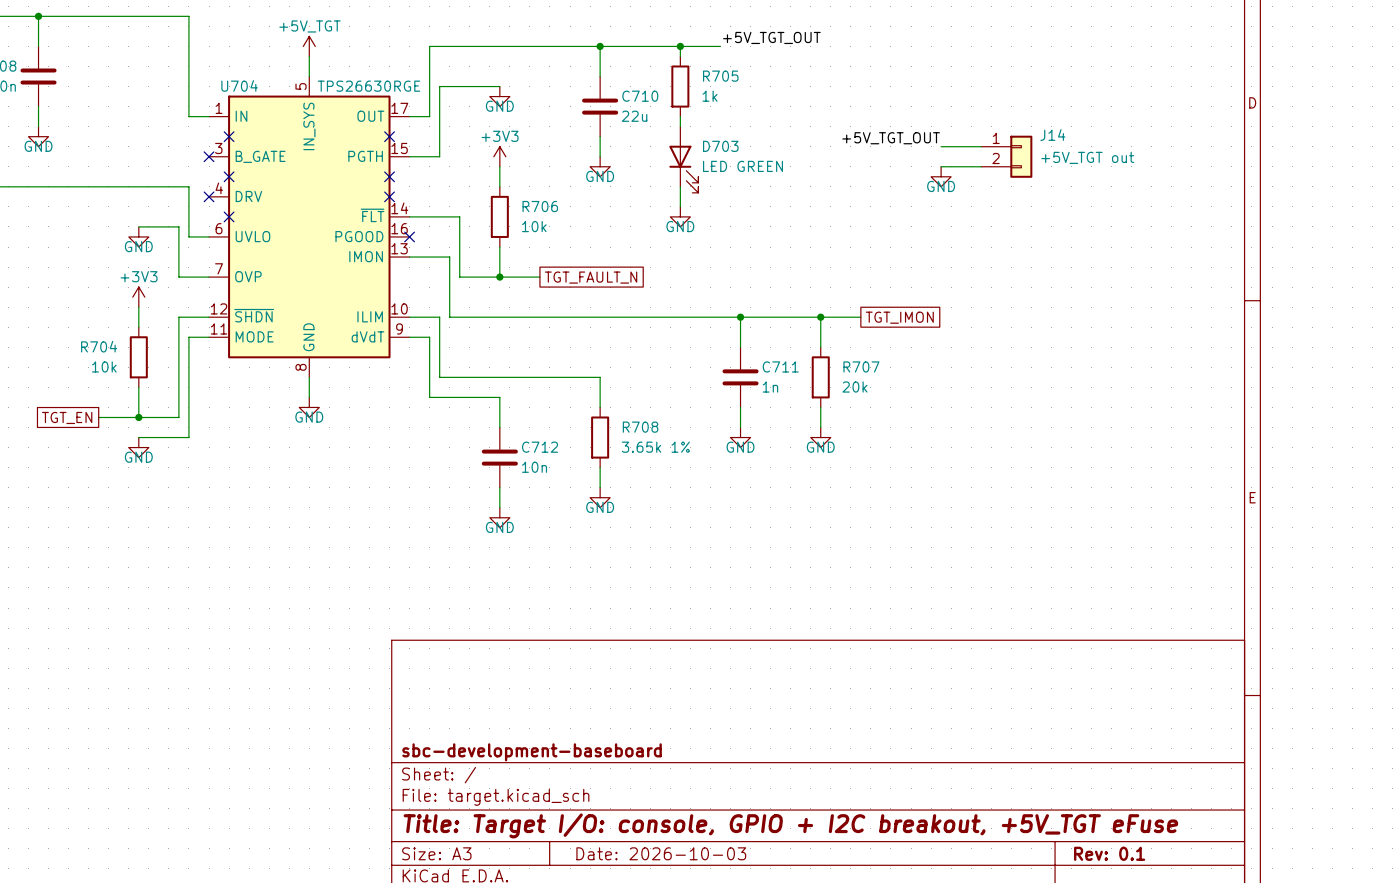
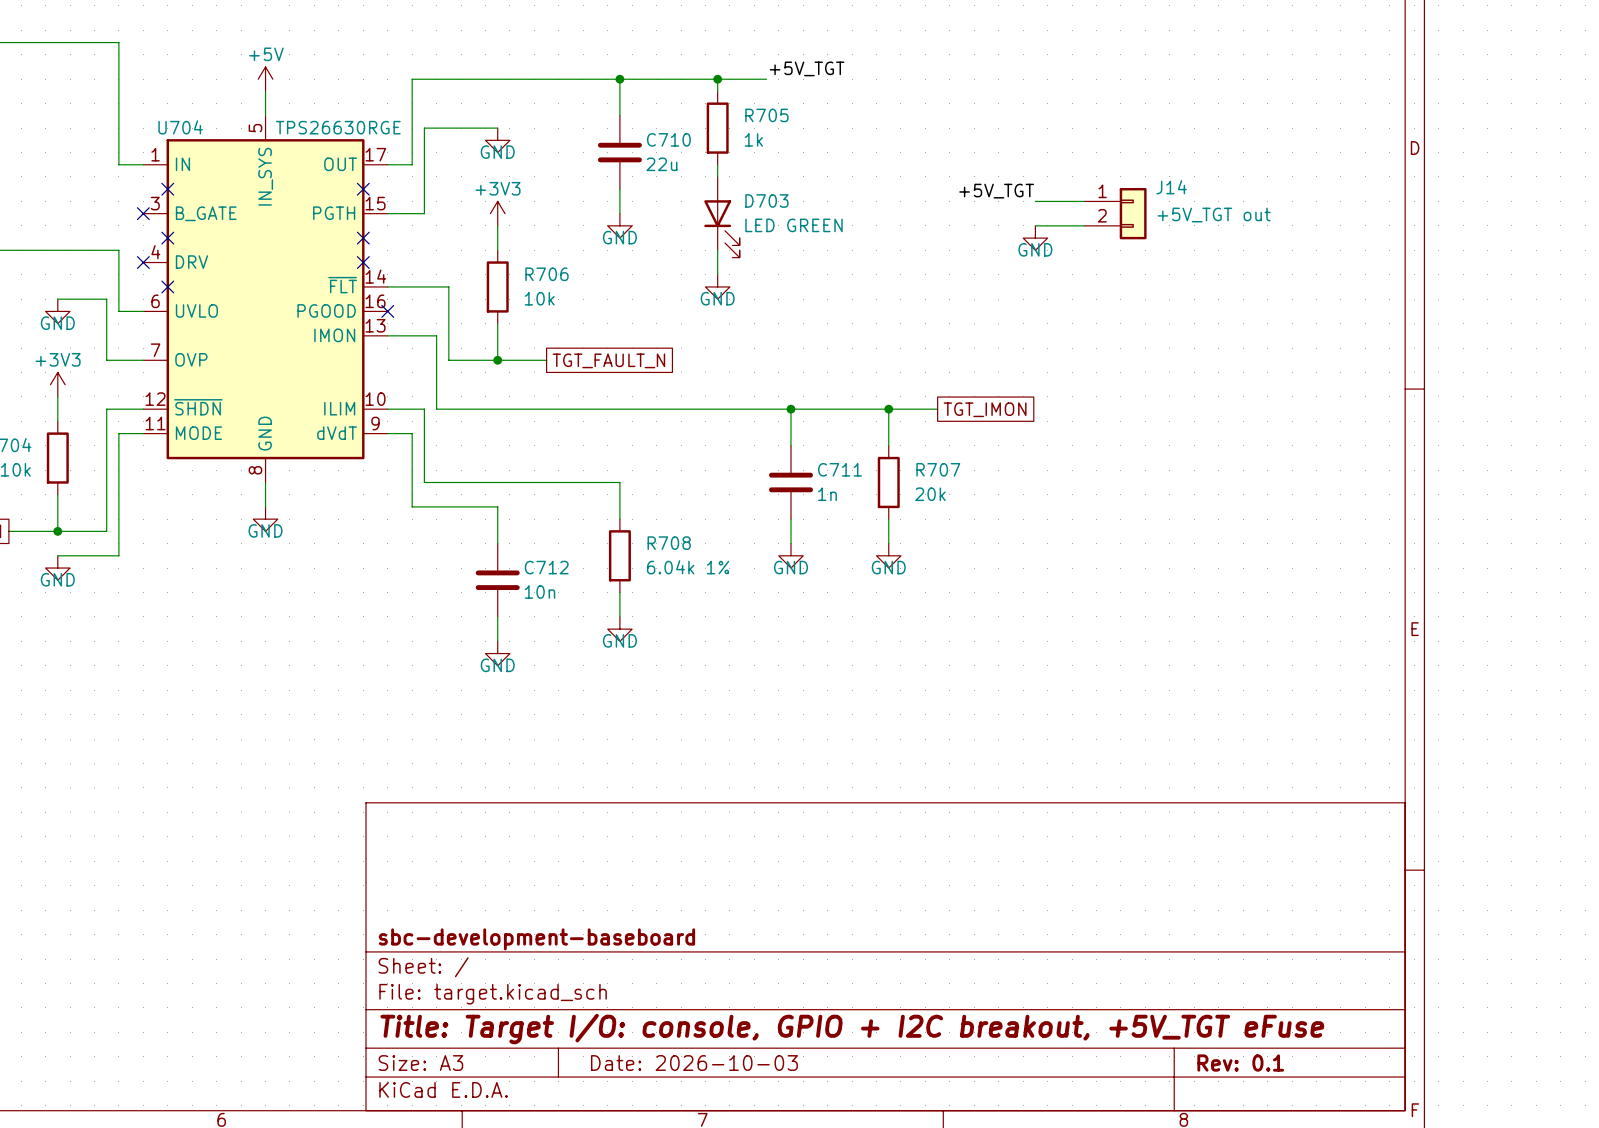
label: +5V_TGT_OUT (771, 37) -> +5V_TGT (807, 68)
power symbol: +5V_TGT (309, 46) -> +5V (265, 79)
label: +5V_TGT_OUT (891, 138) -> +5V_TGT (996, 191)
R708 value: 3.65k 1% (655, 447) -> 6.04k 1% (688, 567)

